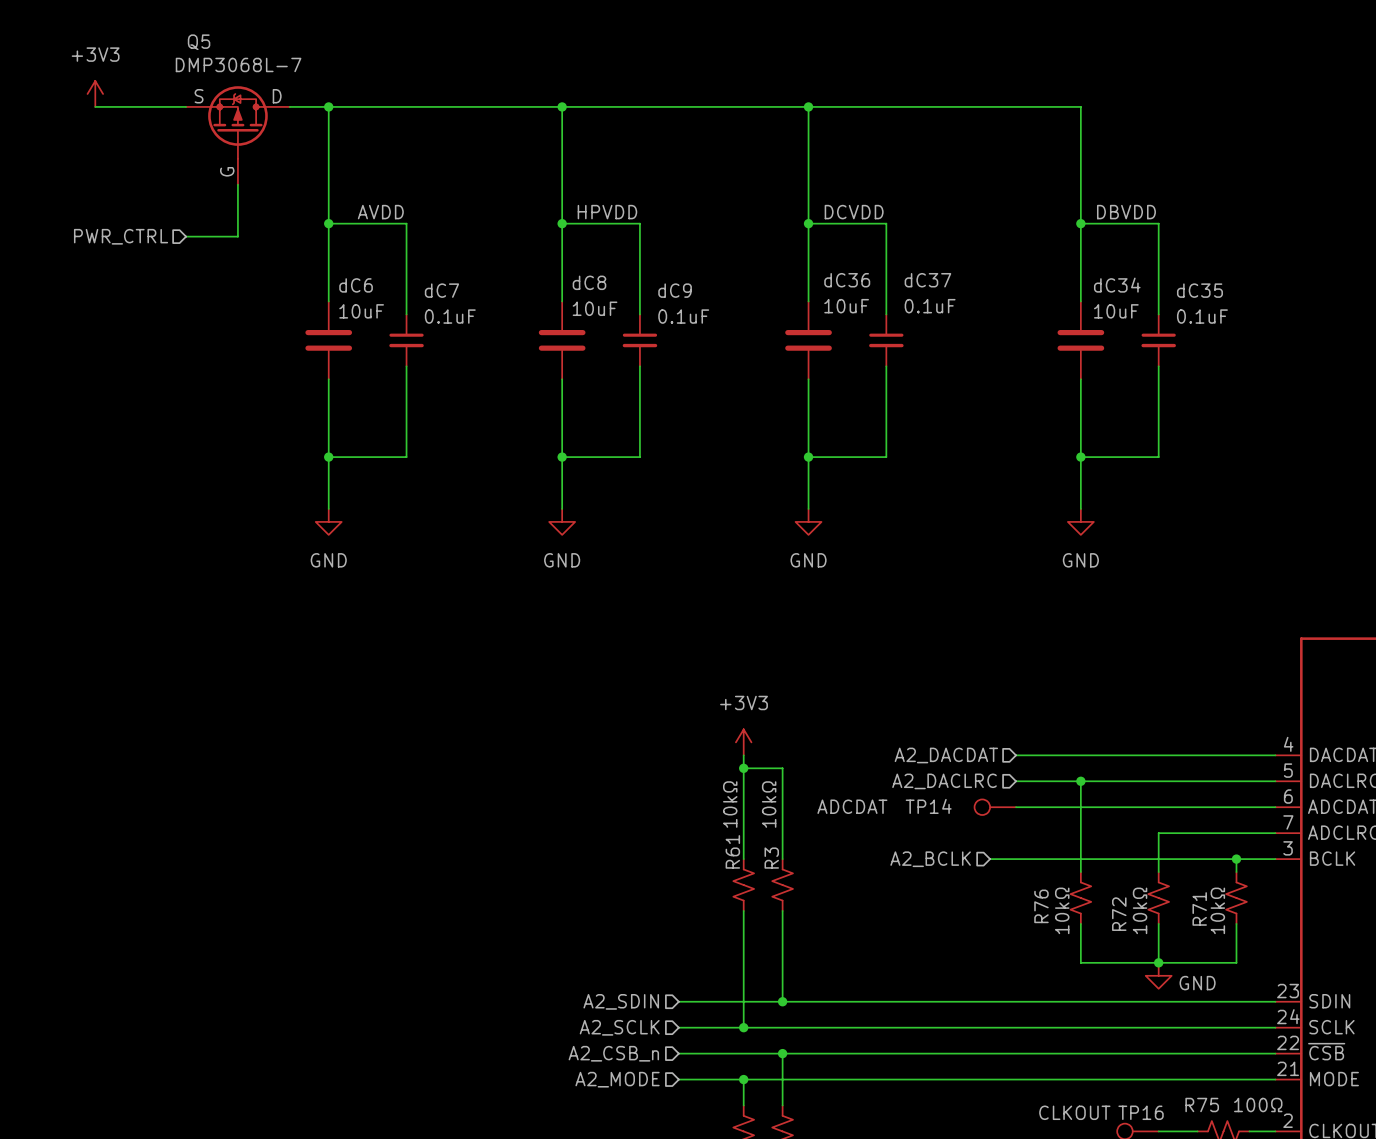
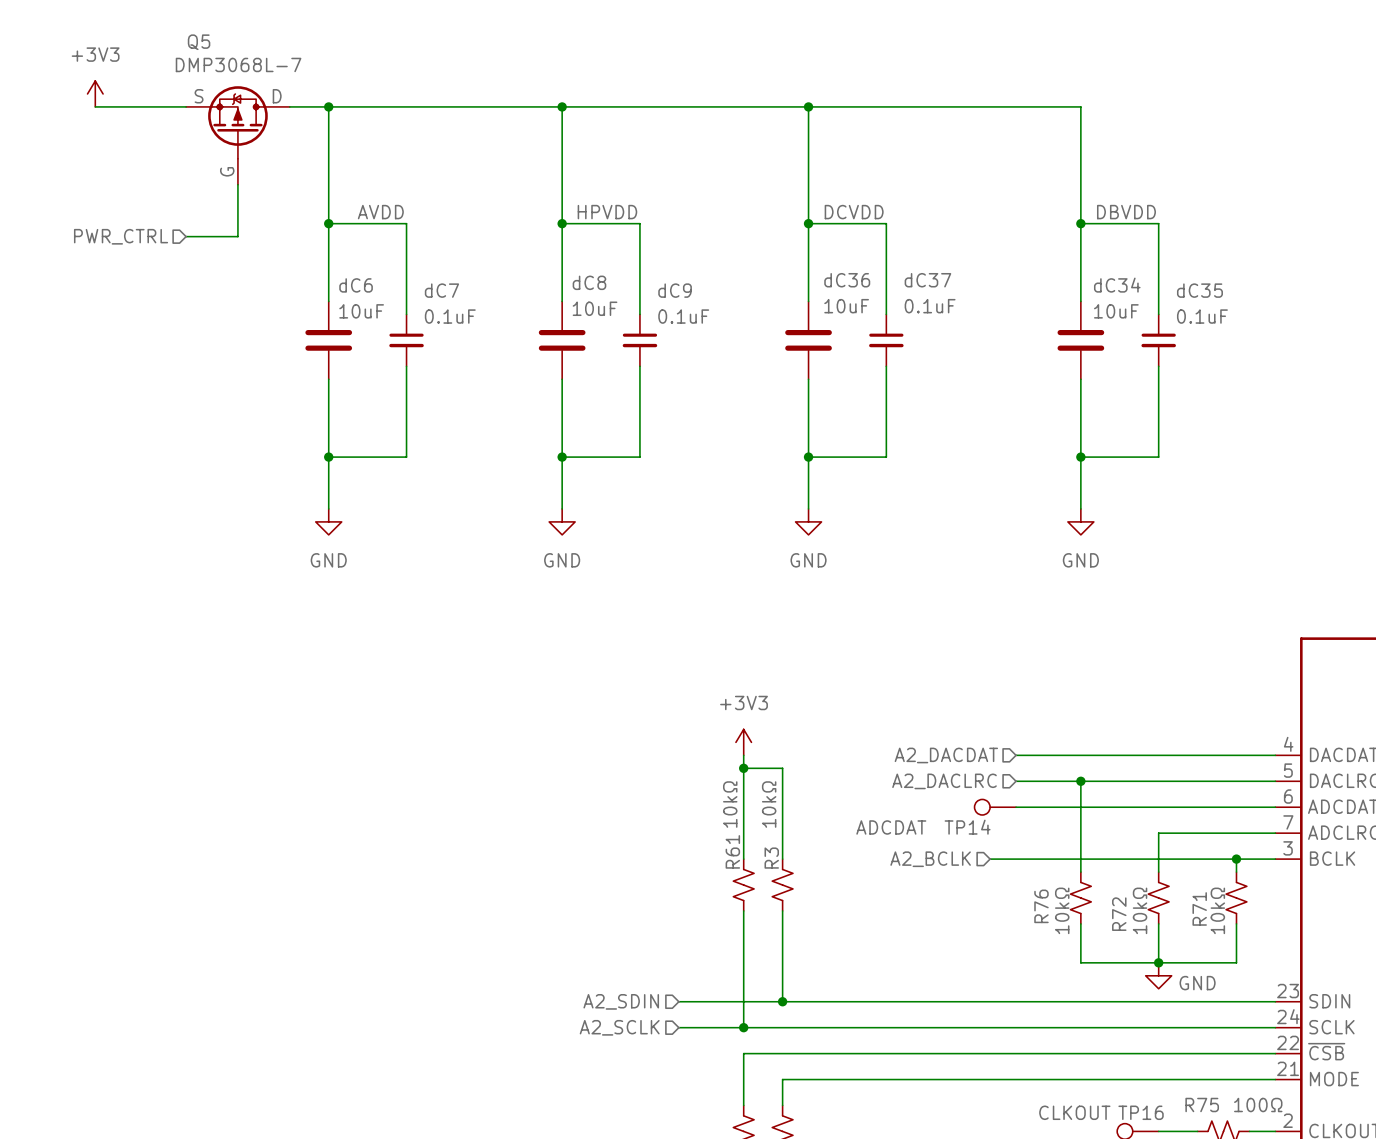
TP14 value position: ADCDAT (852, 806) -> ADCDAT (891, 827)
TP14 name position: TP14 (928, 806) -> TP14 (967, 827)
hierarchical label: A2_CSB_n (613, 1053) -> none
wire: (678, 1053) (743, 1053) -> (743, 1079) (743, 1053)
wire: (782, 1053) (782, 1079) (678, 1079) -> none
junction: (782, 1053) -> none
hierarchical label: A2_MODE (617, 1079) -> none
junction: (743, 1079) -> none

